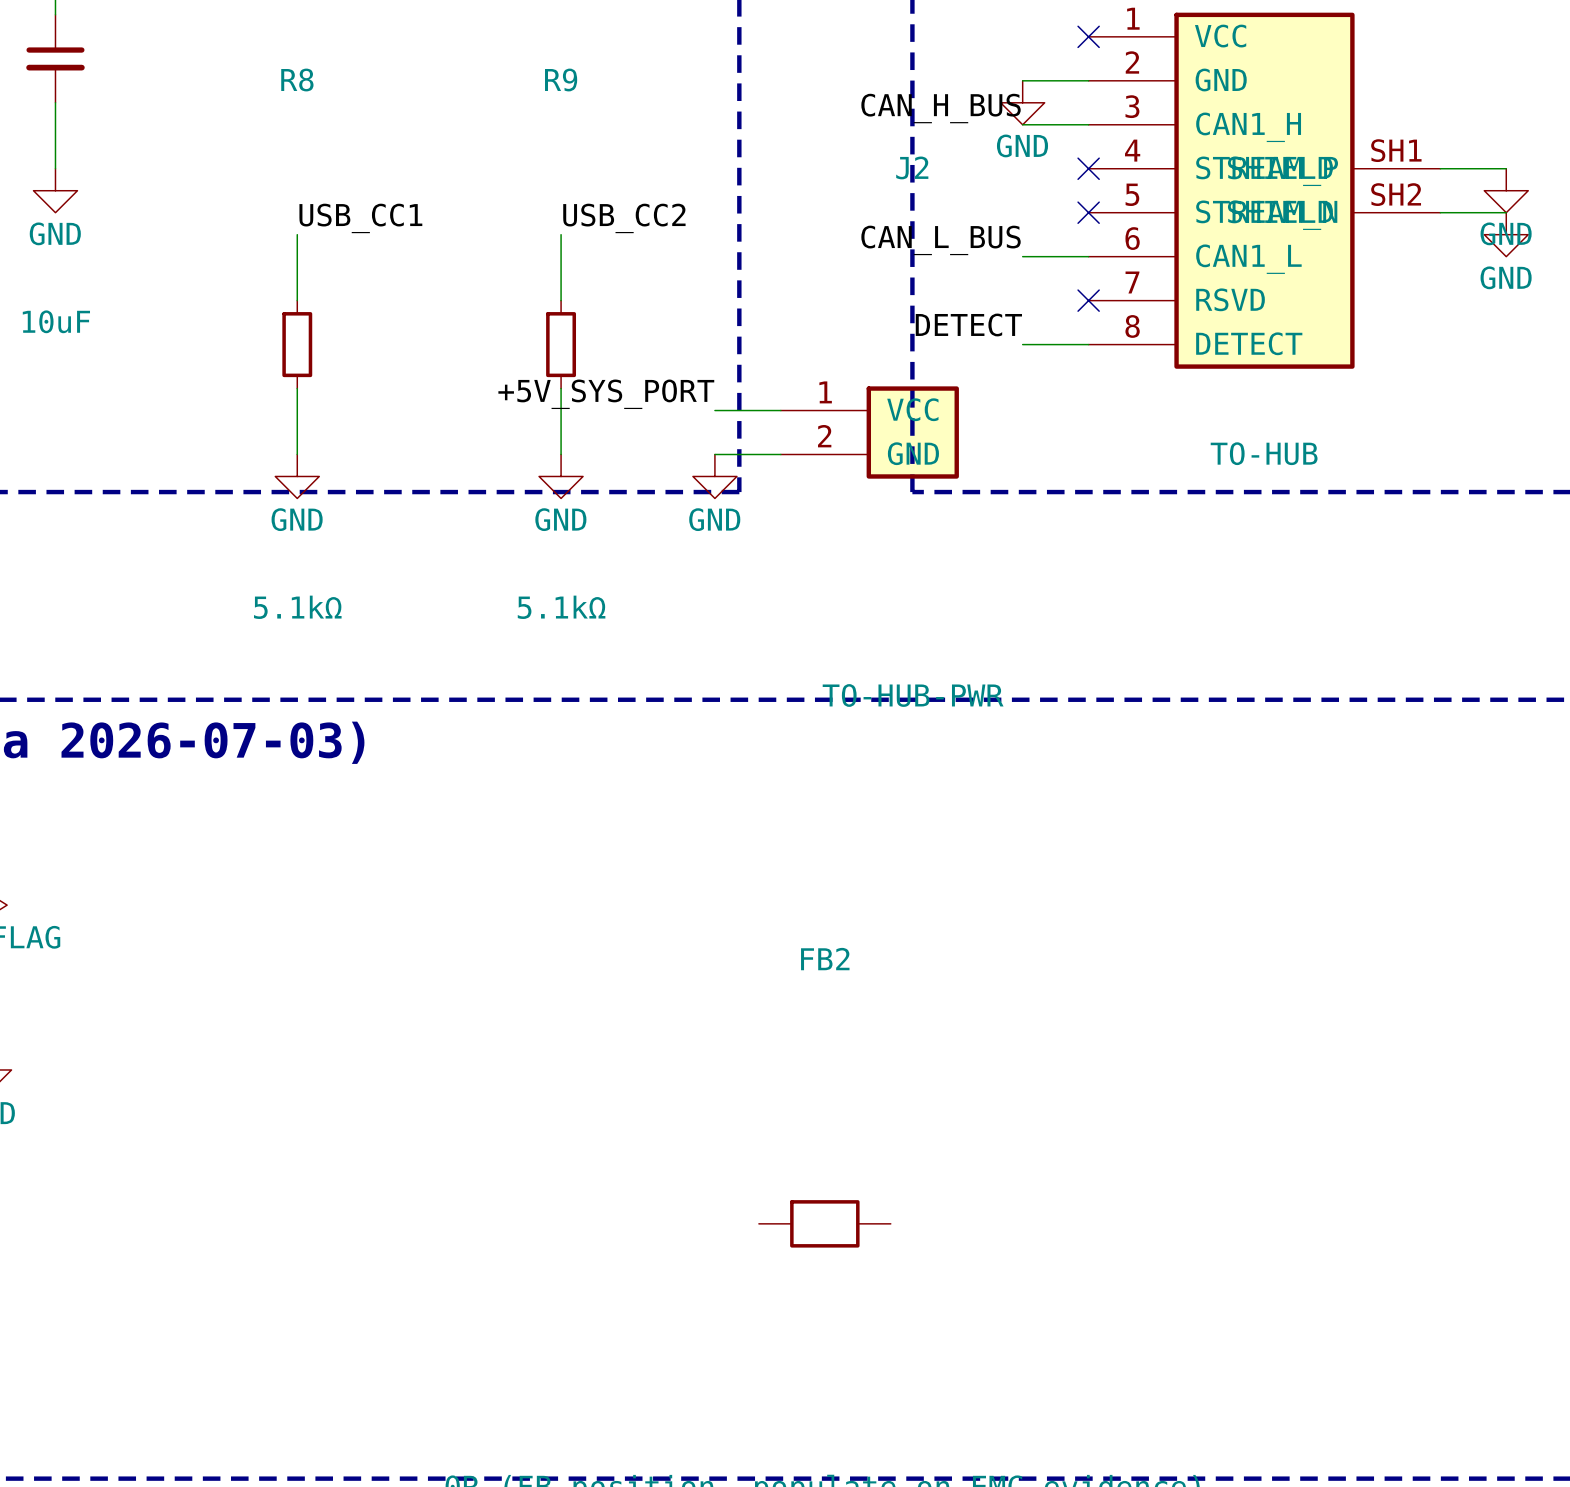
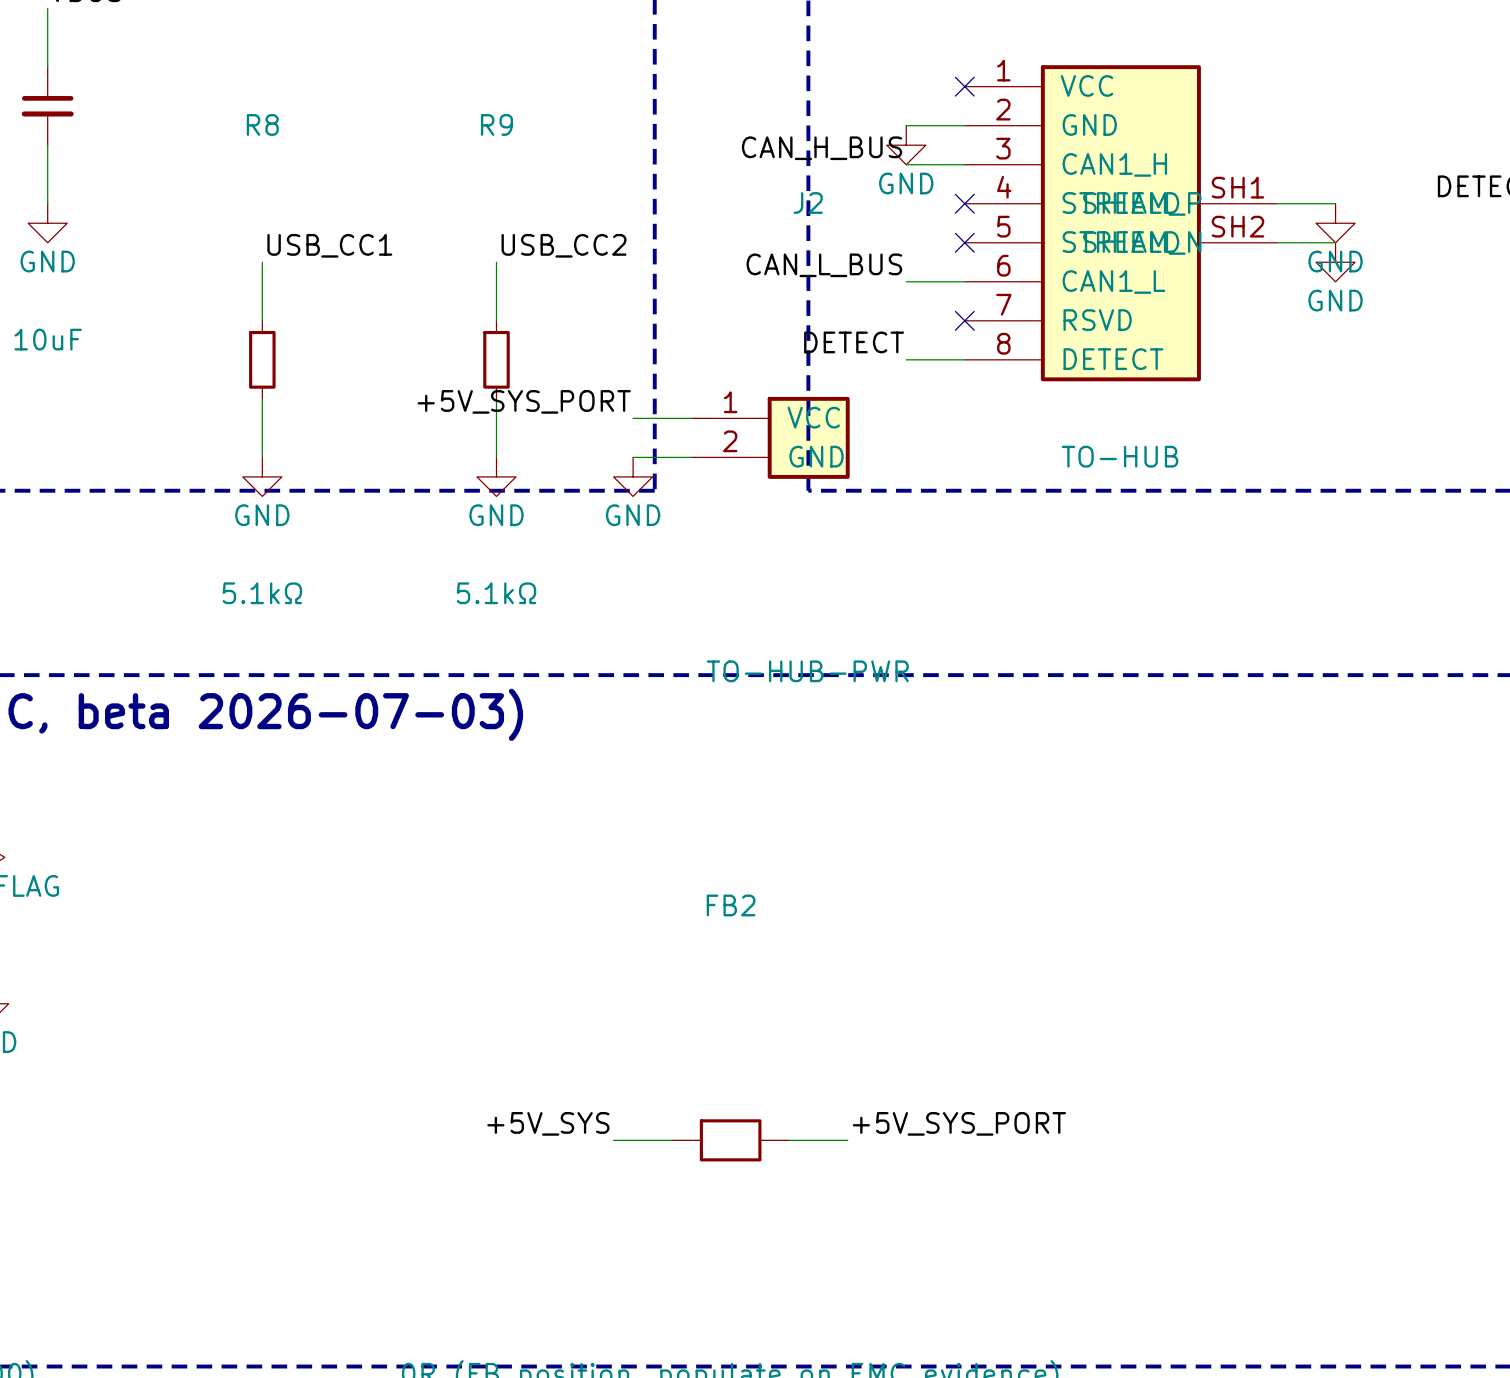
label: none -> +5V_SYS (548, 1123)
label: none -> +5V_SYS_PORT (959, 1123)
wire: none -> (613, 1140) (672, 1140)
wire: none -> (789, 1140) (847, 1140)

